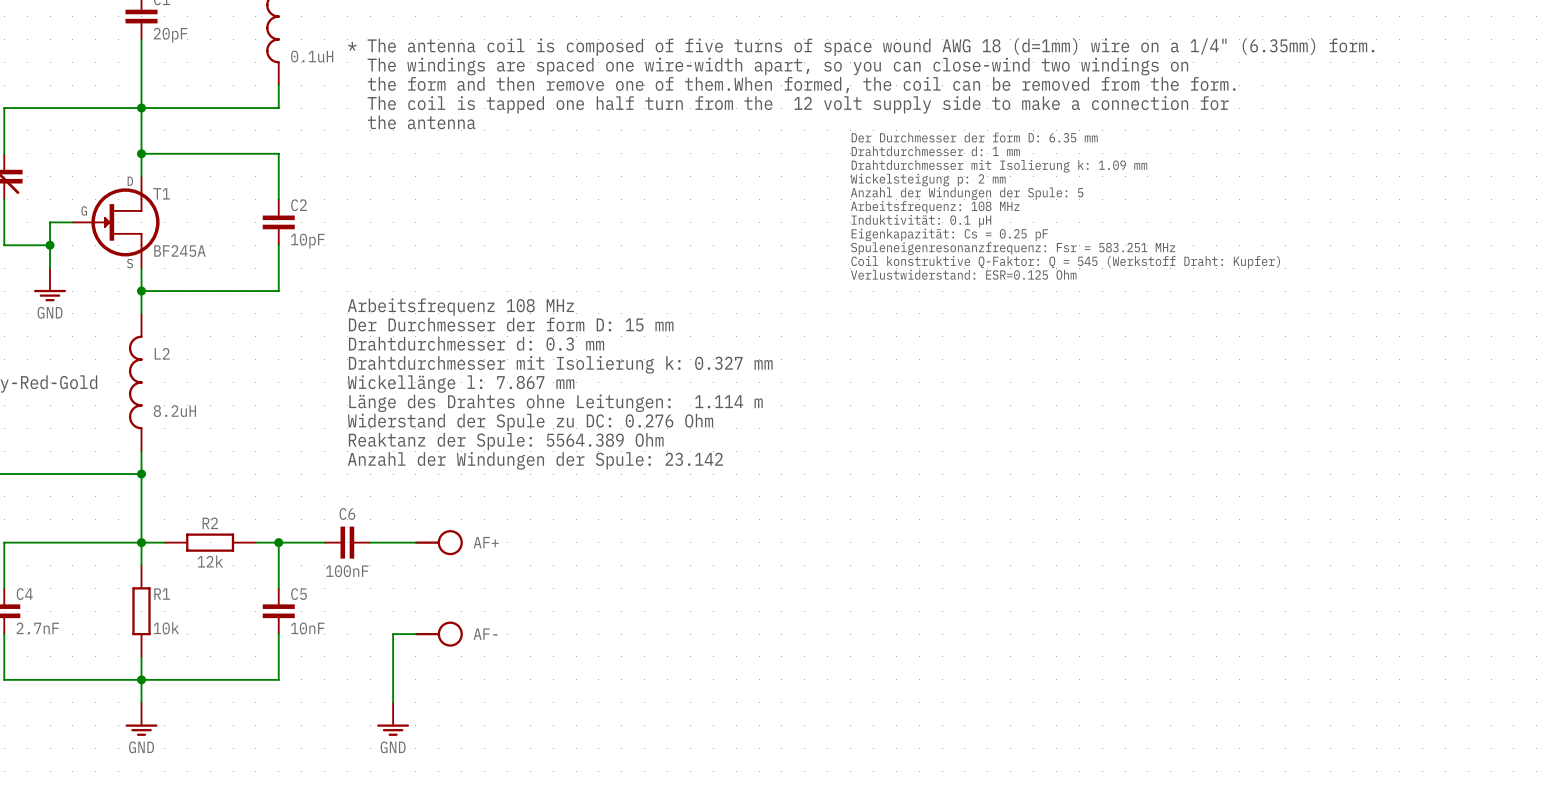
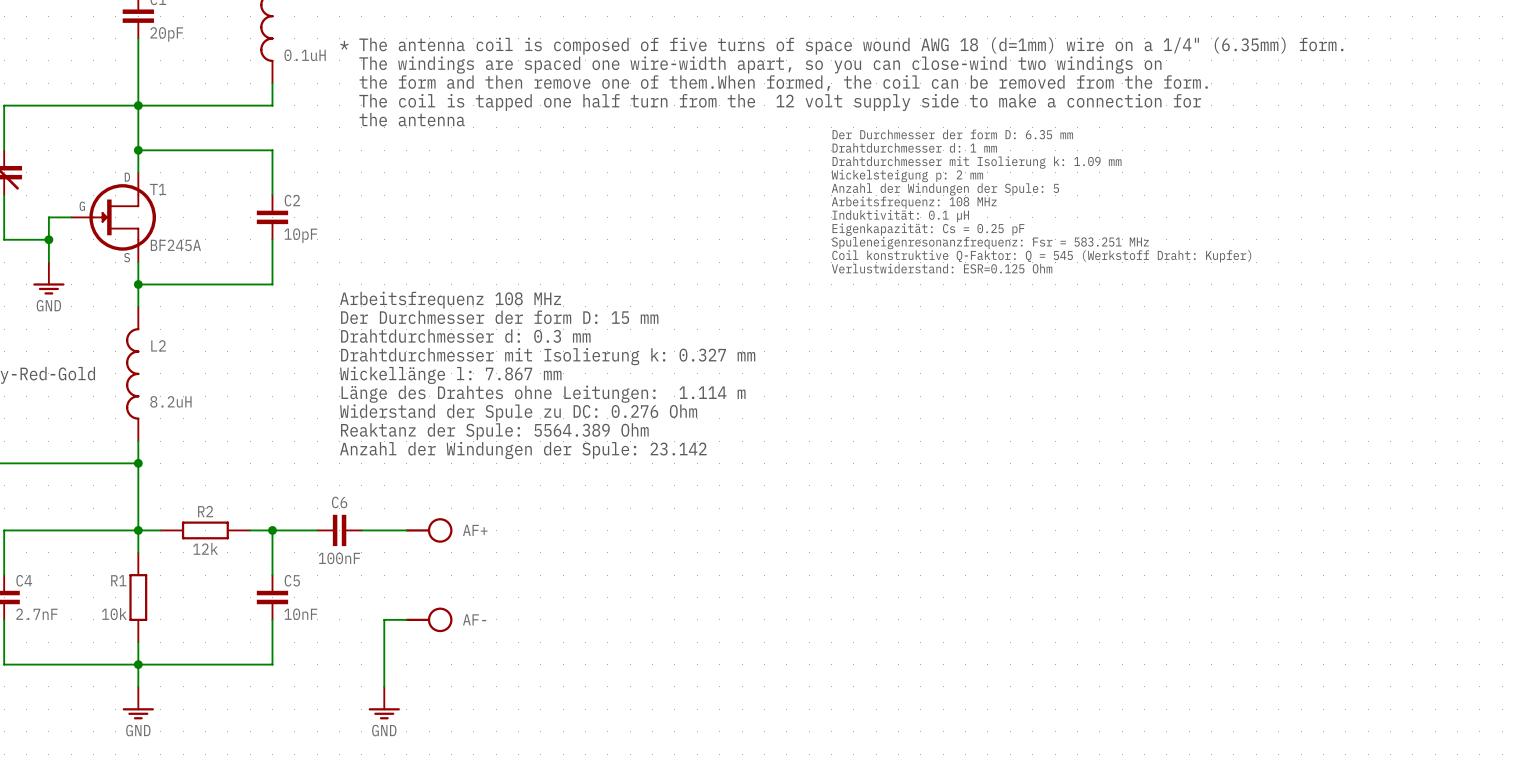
R1 name position: R1 (162, 594) -> R1 (118, 580)
R1 value position: 10k (166, 628) -> 10k (114, 614)

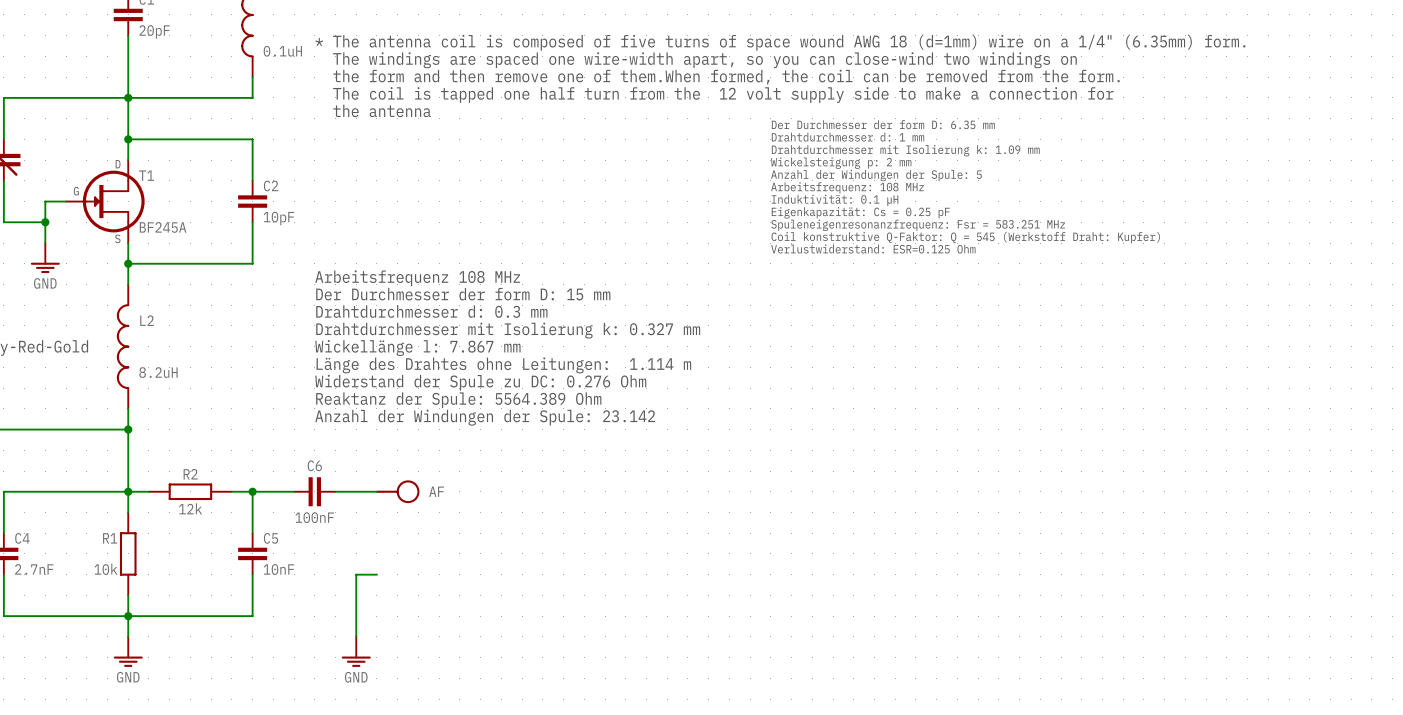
AF+ name: AF+ (475, 530) -> AF (436, 491)
AF-: (429, 619) -> none

